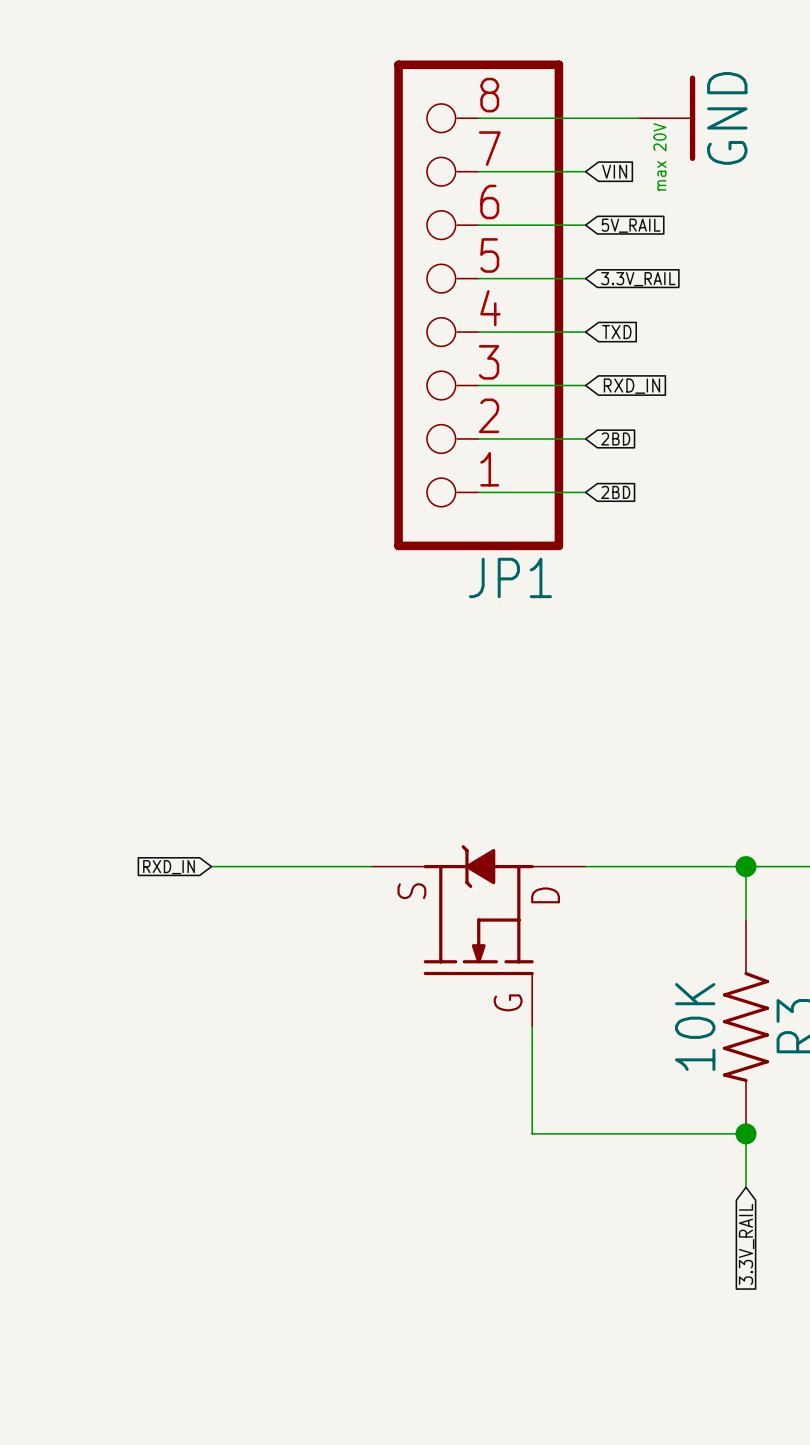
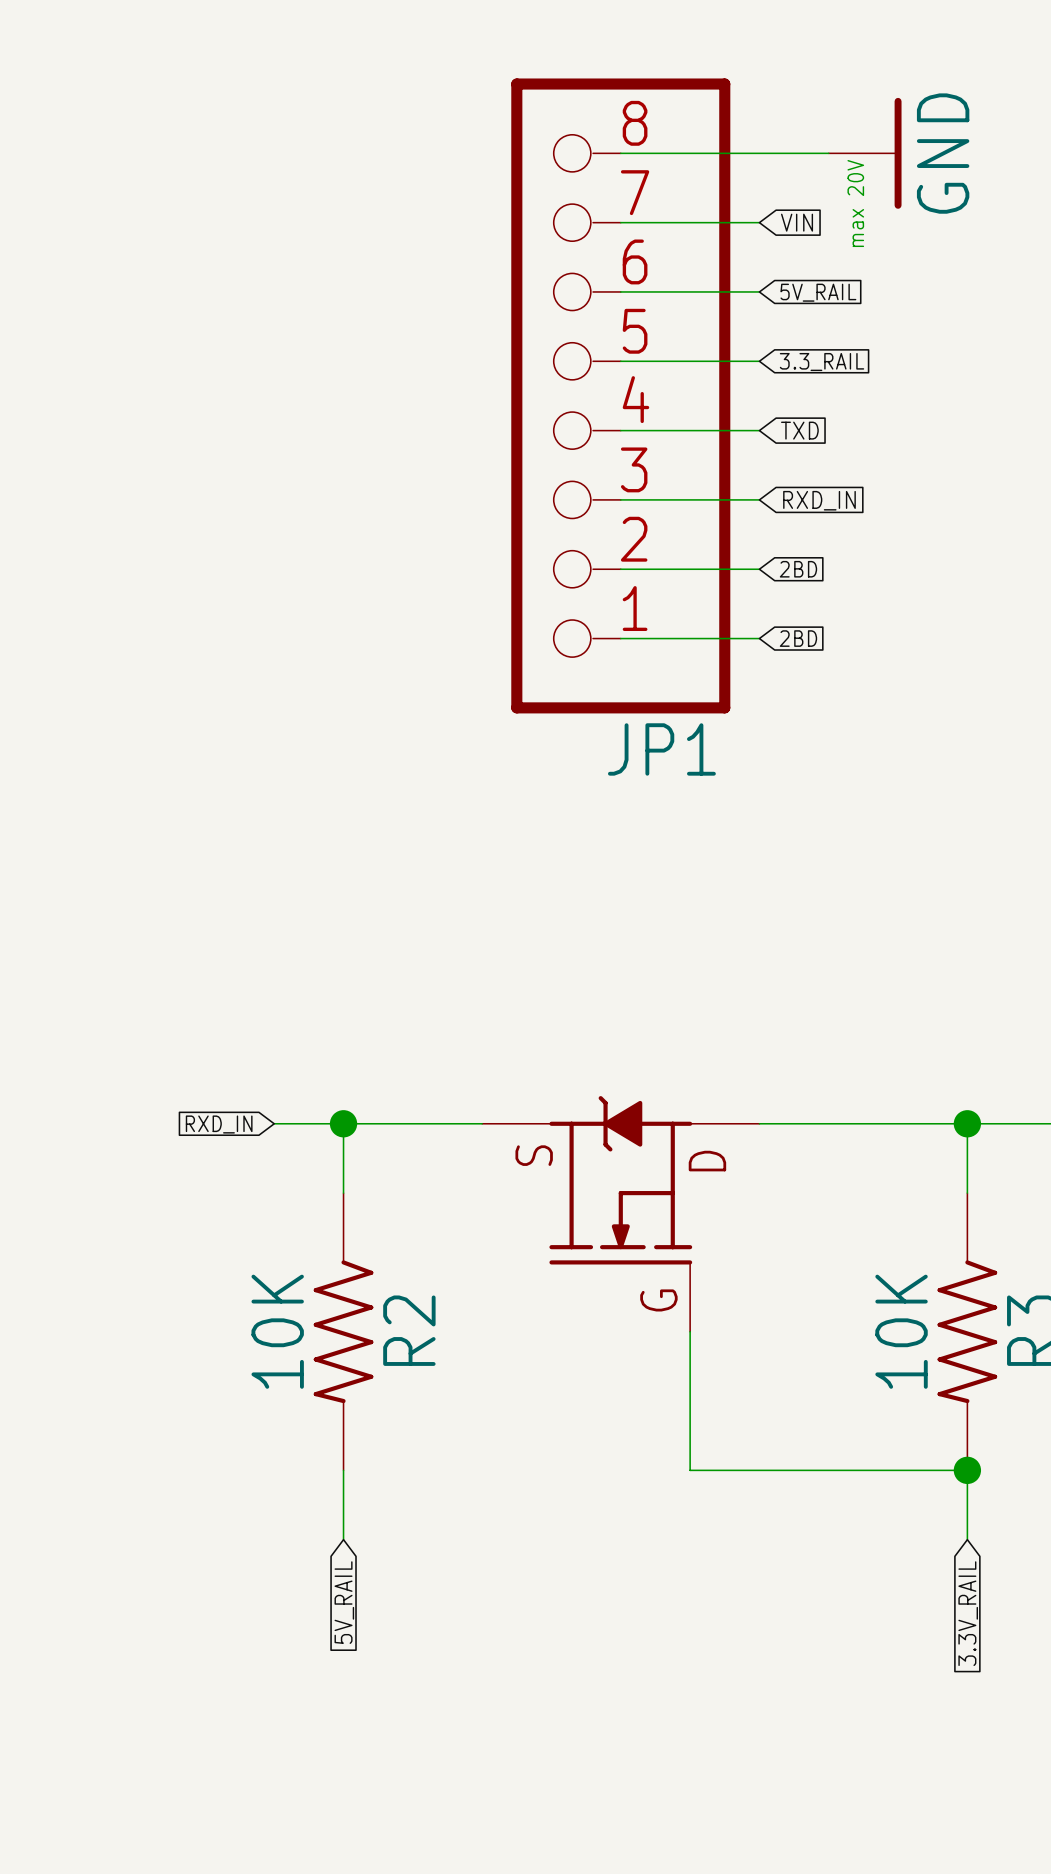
global label: 3.3V_RAIL (638, 279) -> 3.3_RAIL (822, 362)
wire: none -> (343, 1123) (343, 1193)
junction: none -> (343, 1123)
R2: none -> 10K (343, 1331)
wire: none -> (343, 1470) (343, 1539)
global label: none -> 5V_RAIL (344, 1602)

